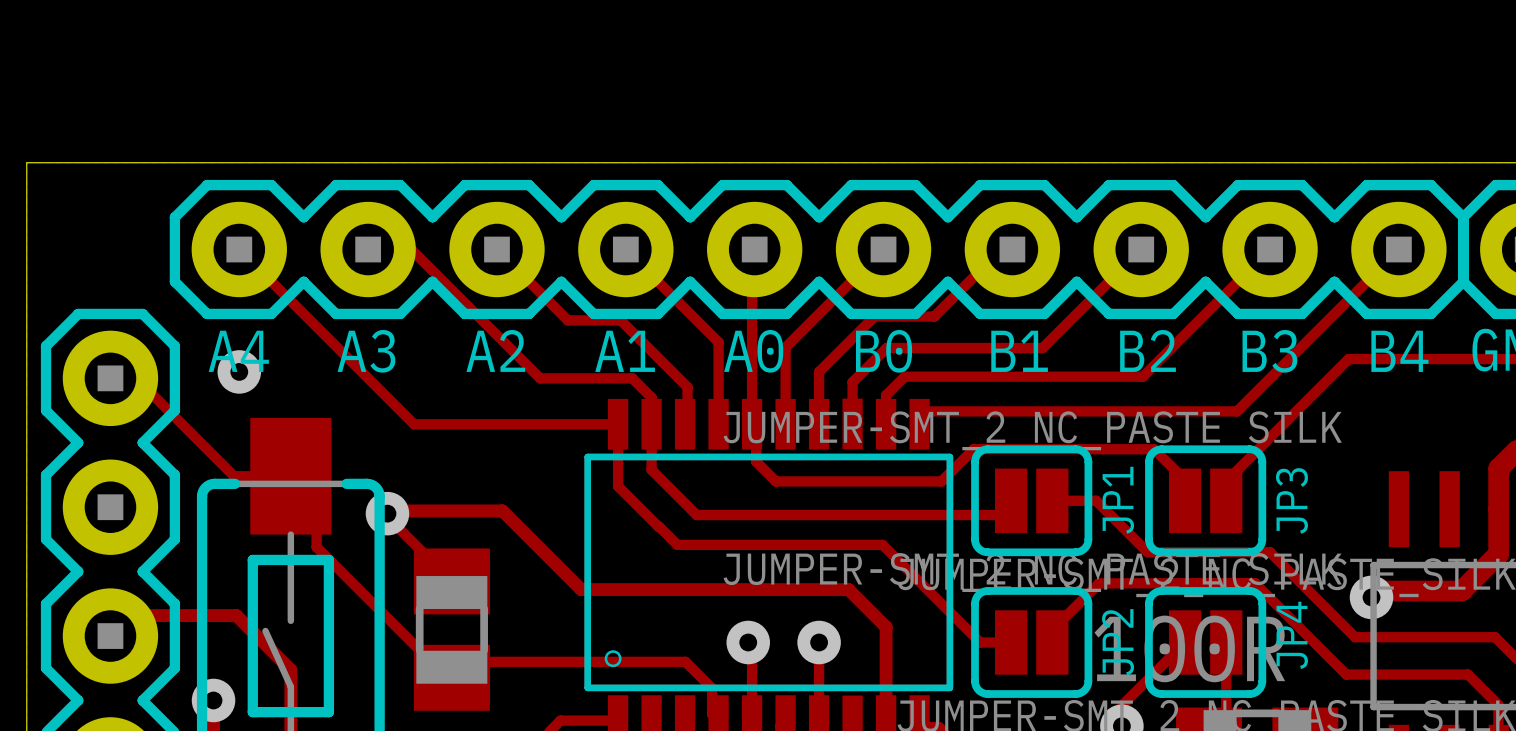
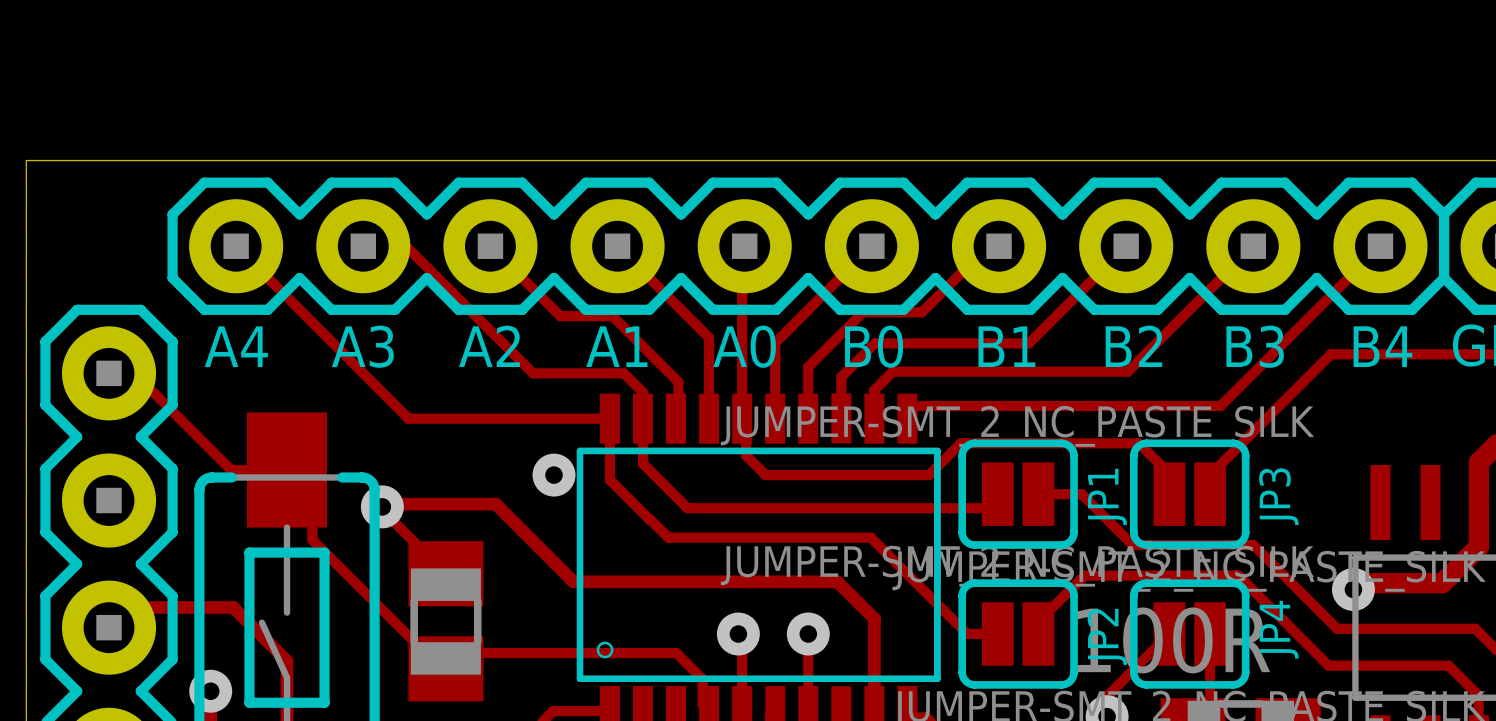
via: (239, 371) -> none
via: none -> (554, 475)

